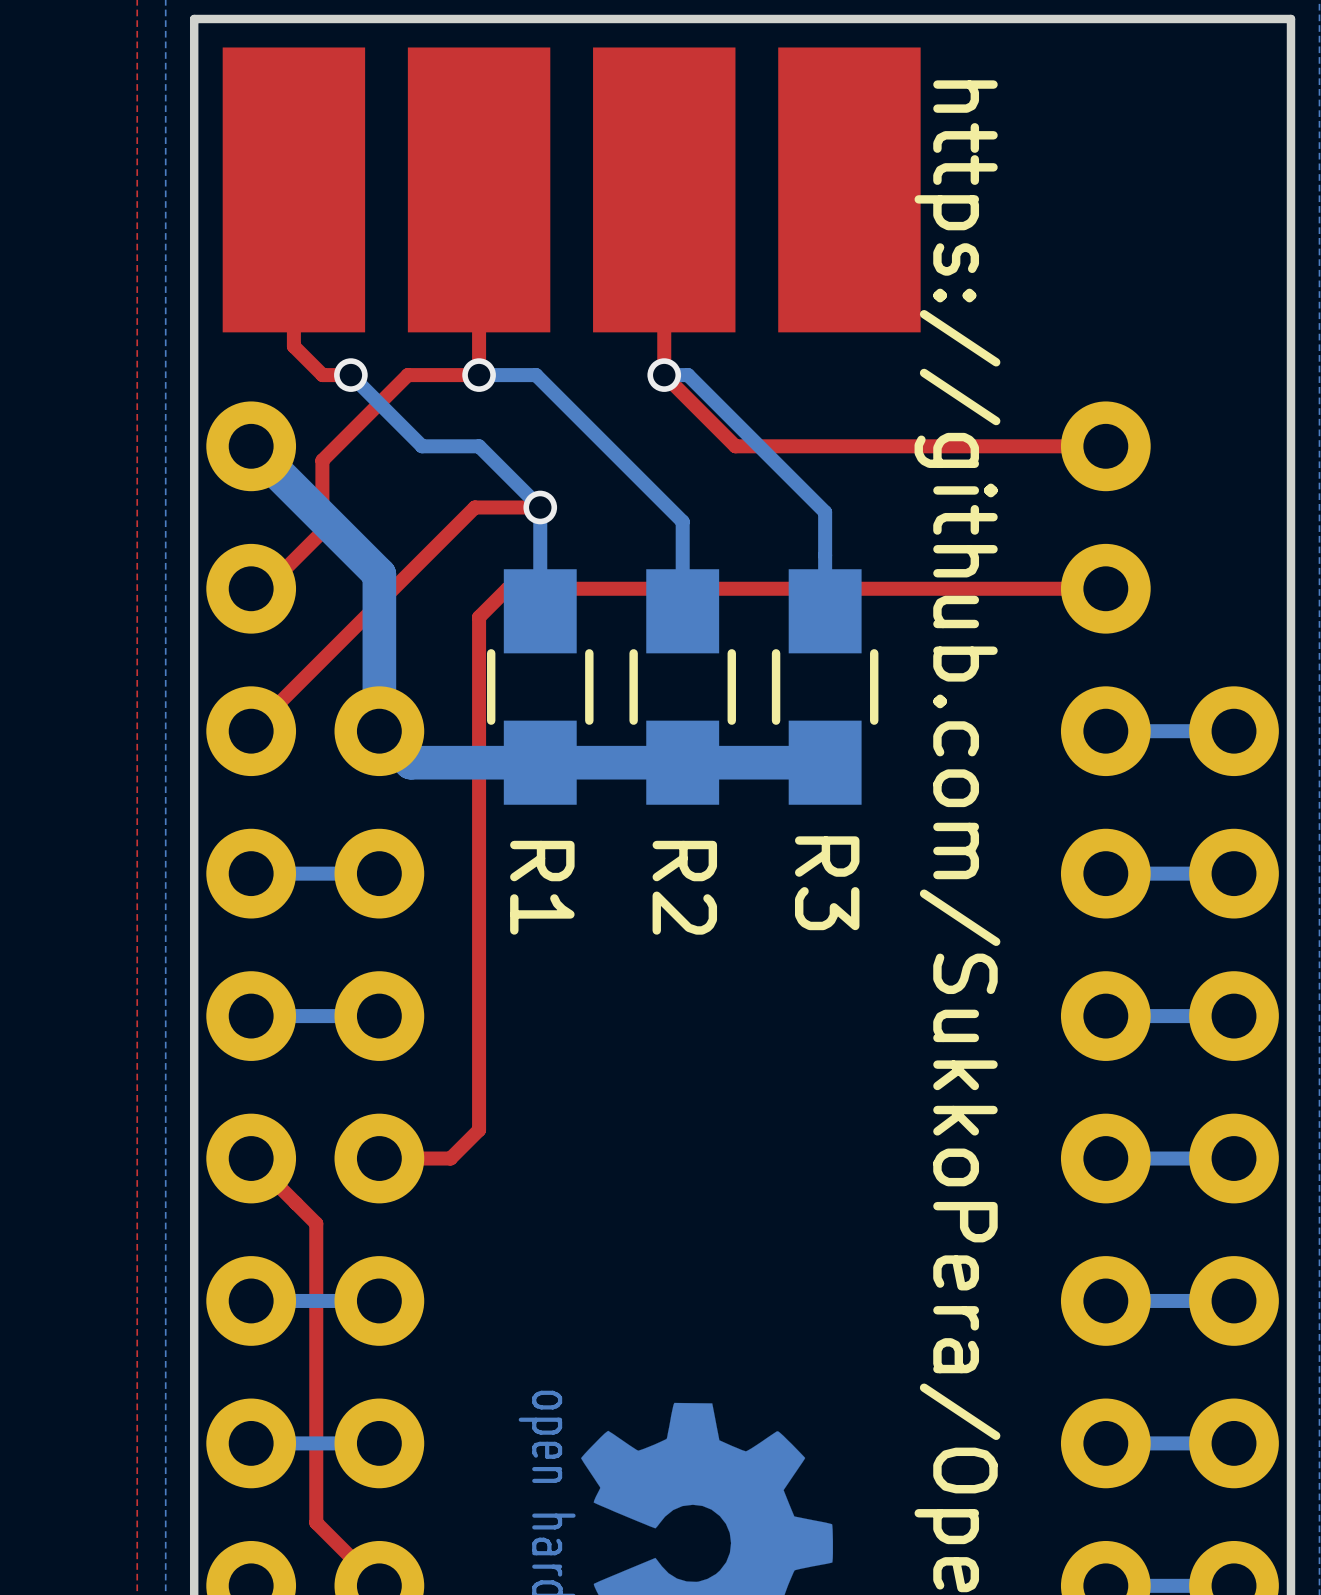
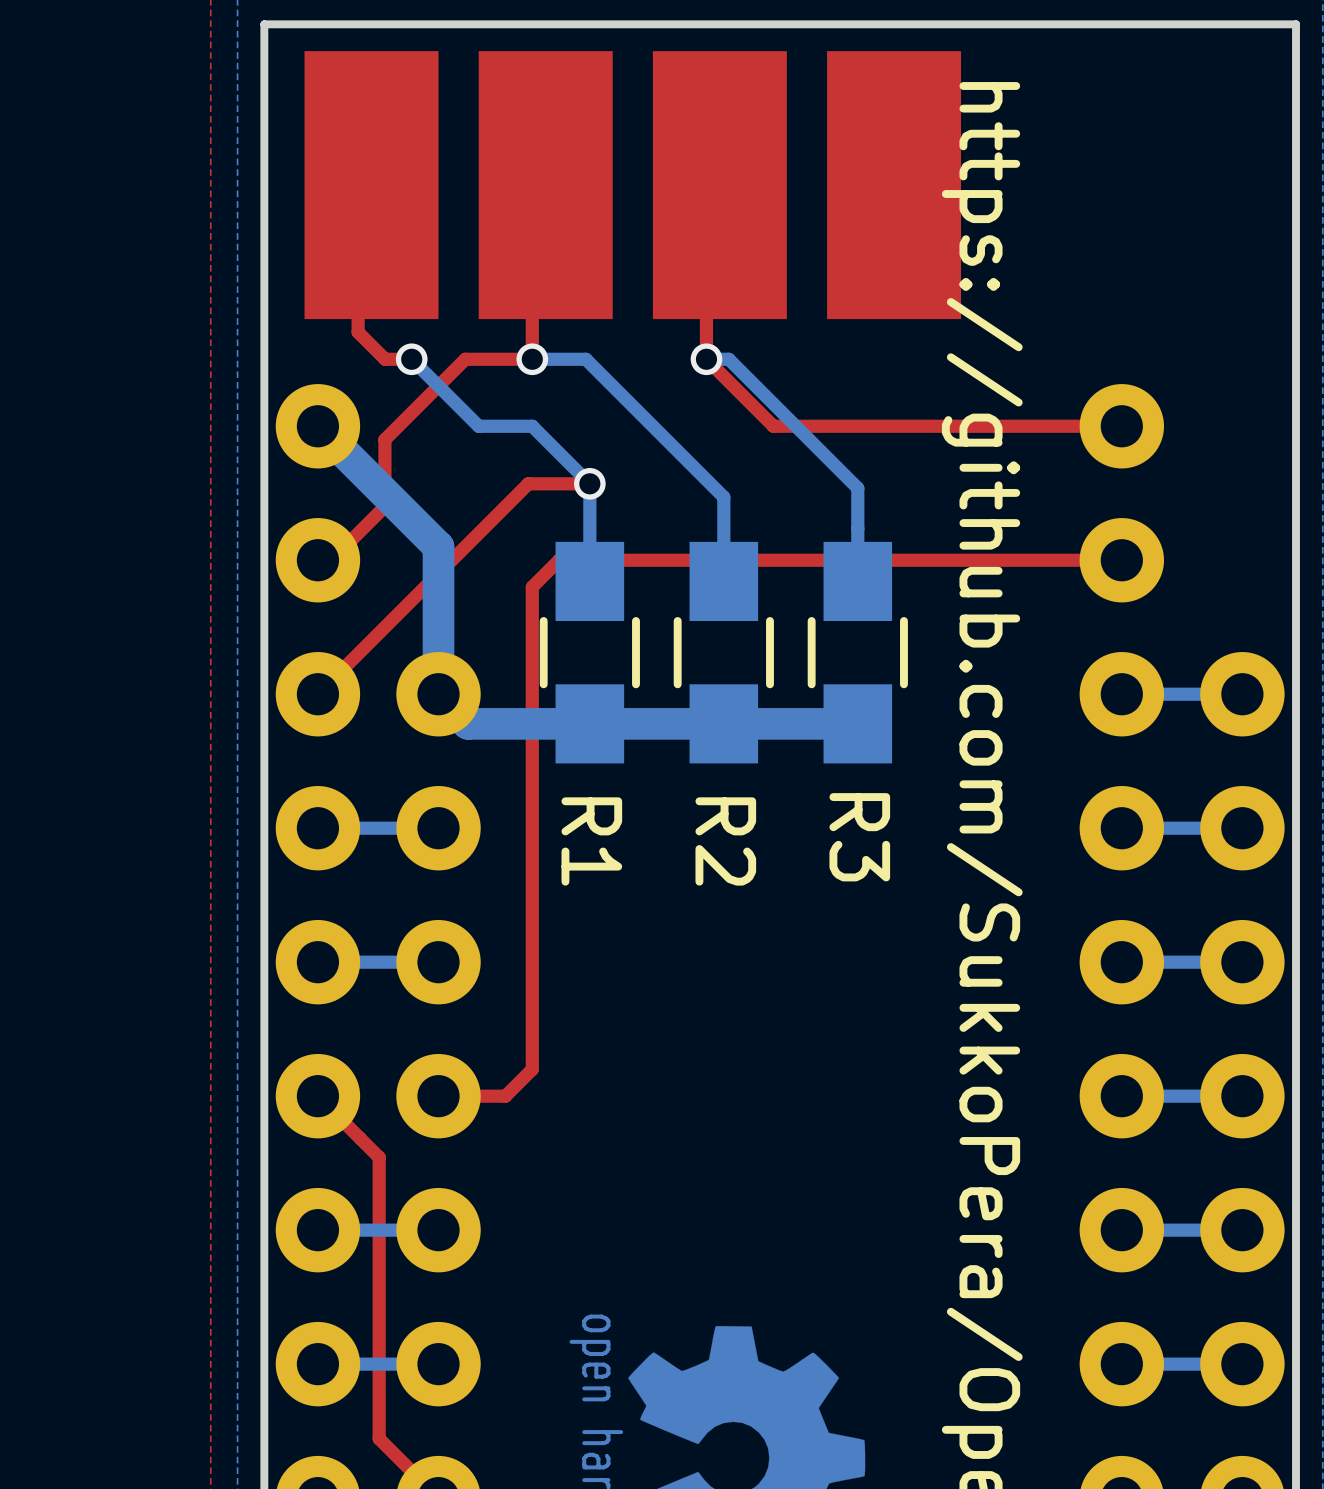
part position: (571, 189) -> (632, 185)

